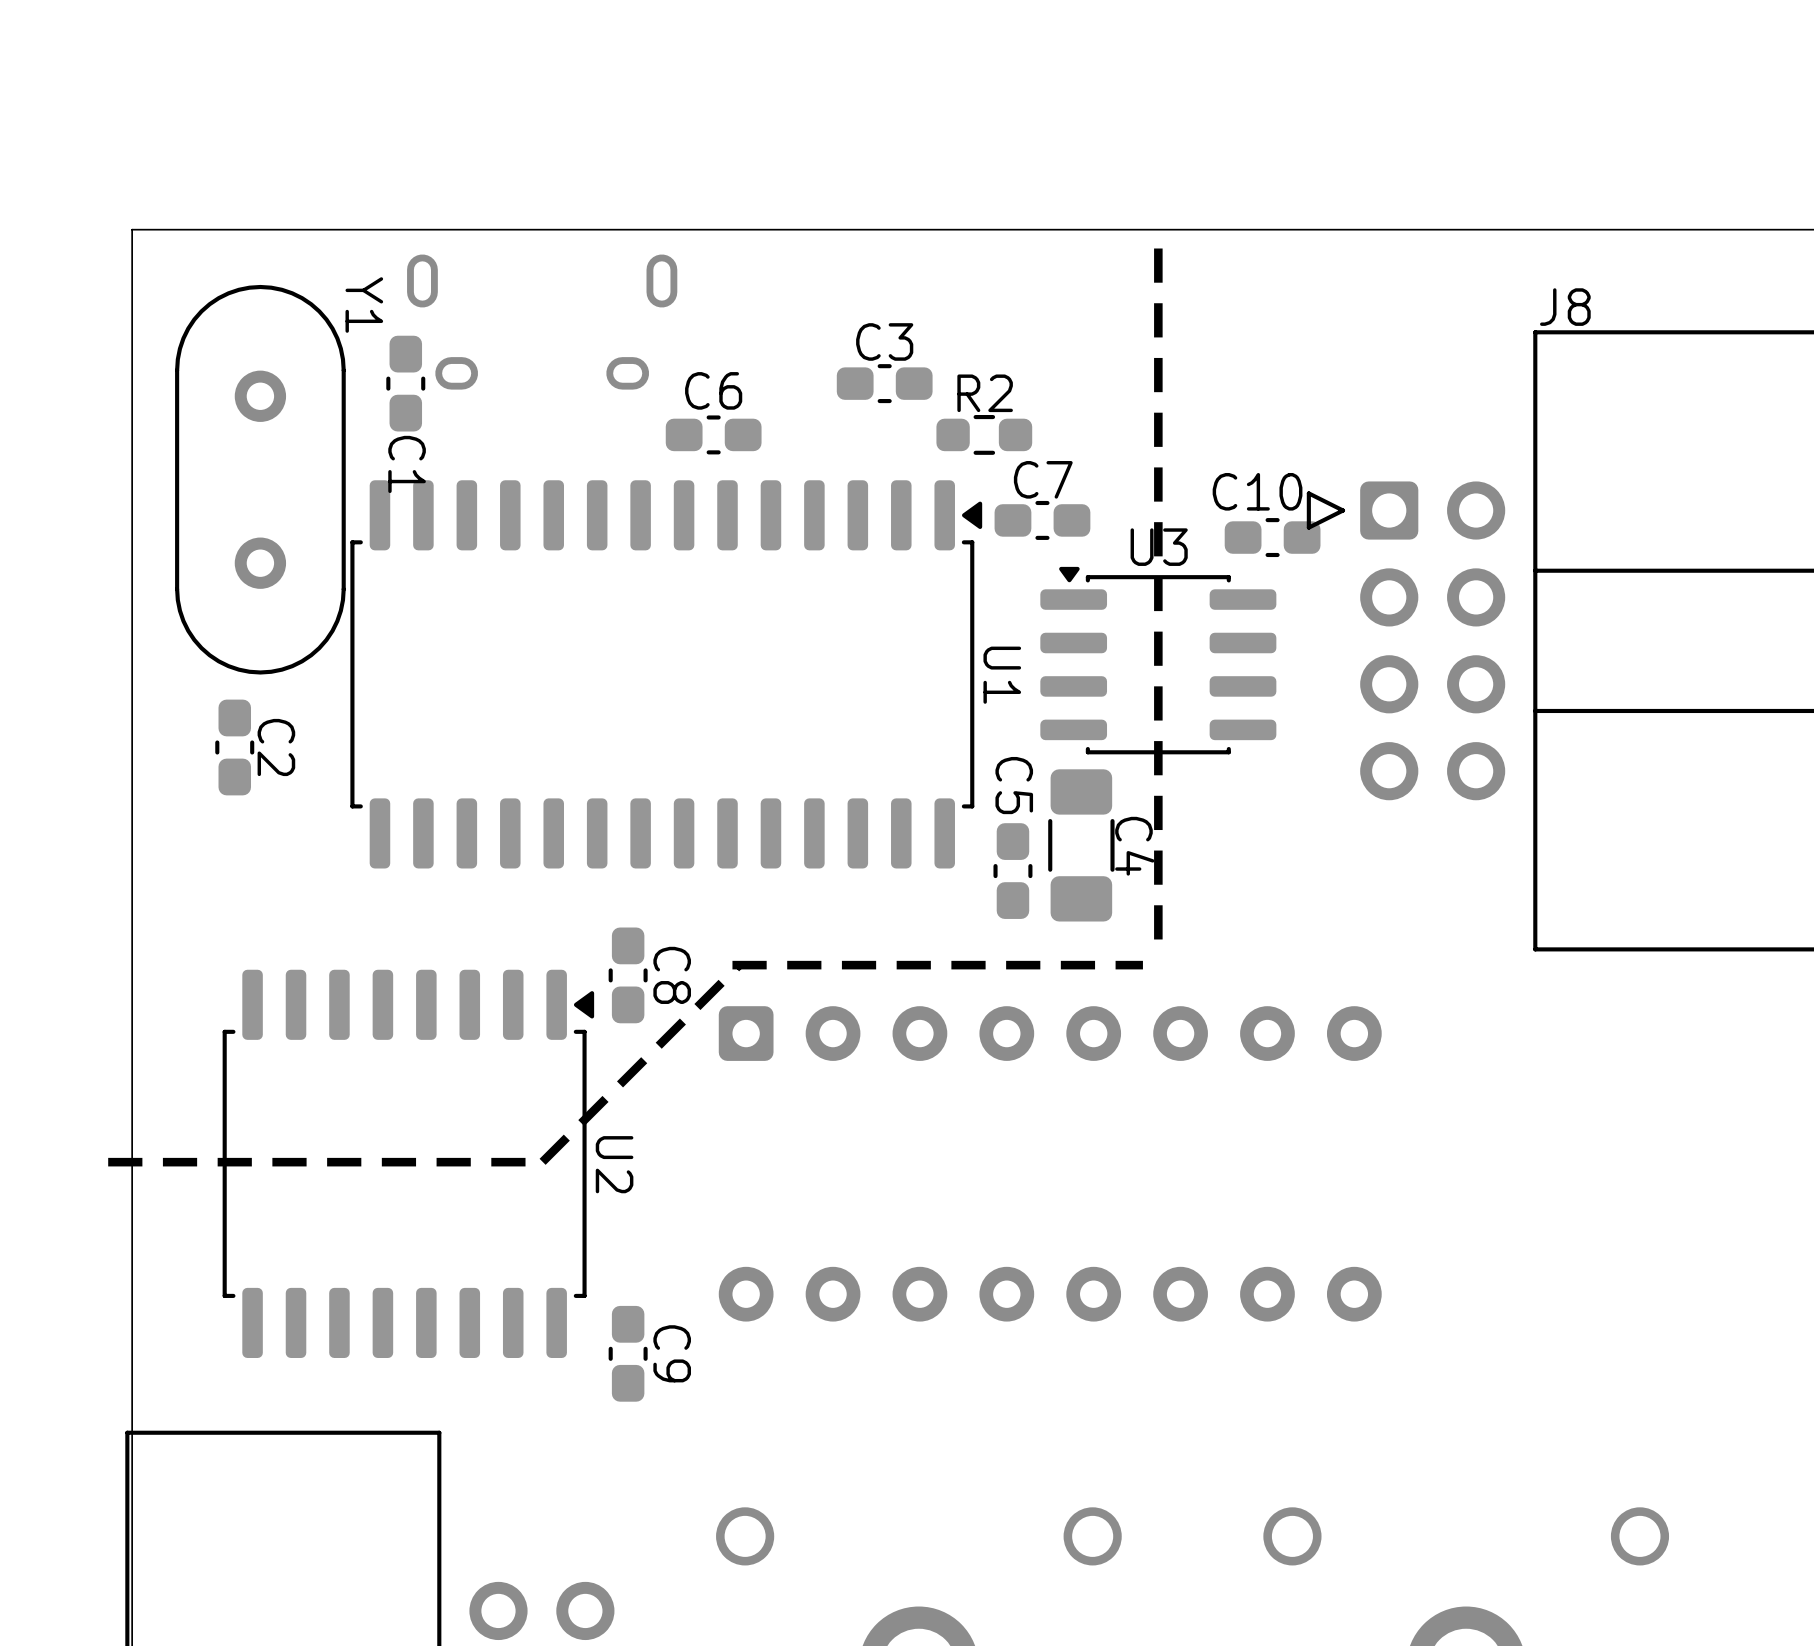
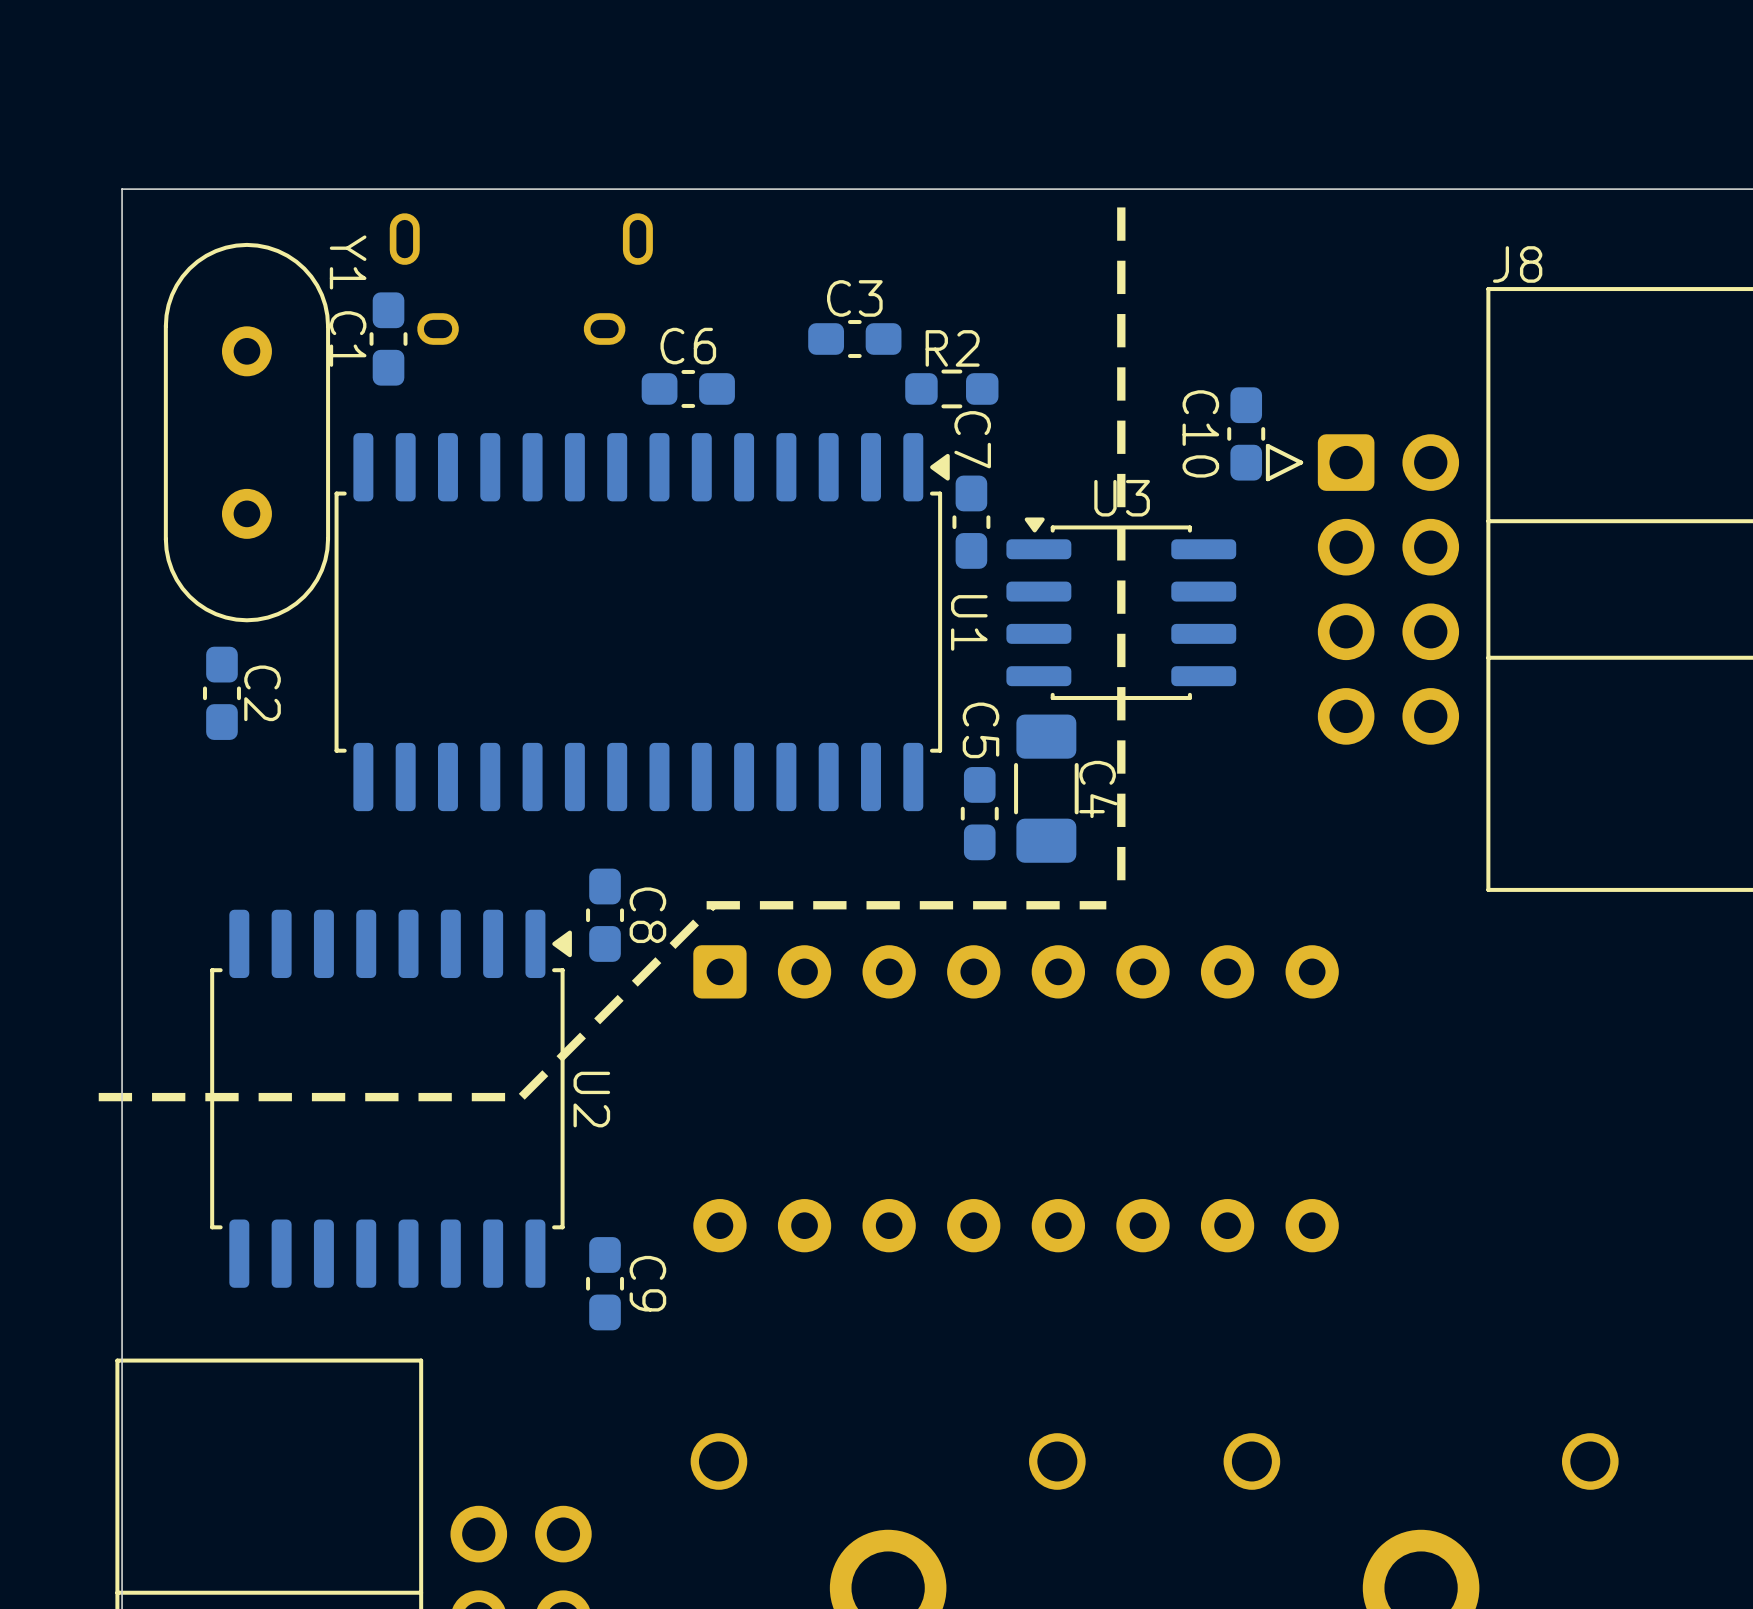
C1 name position: C1 (407, 464) -> C1 (348, 339)
C7 rotation: 0° (1042, 520) -> 90° clockwise (971, 522)
C7 position: (1042, 520) -> (971, 522)
C10 rotation: 0° (1272, 537) -> 90° clockwise (1246, 433)
C10 position: (1272, 537) -> (1246, 433)

